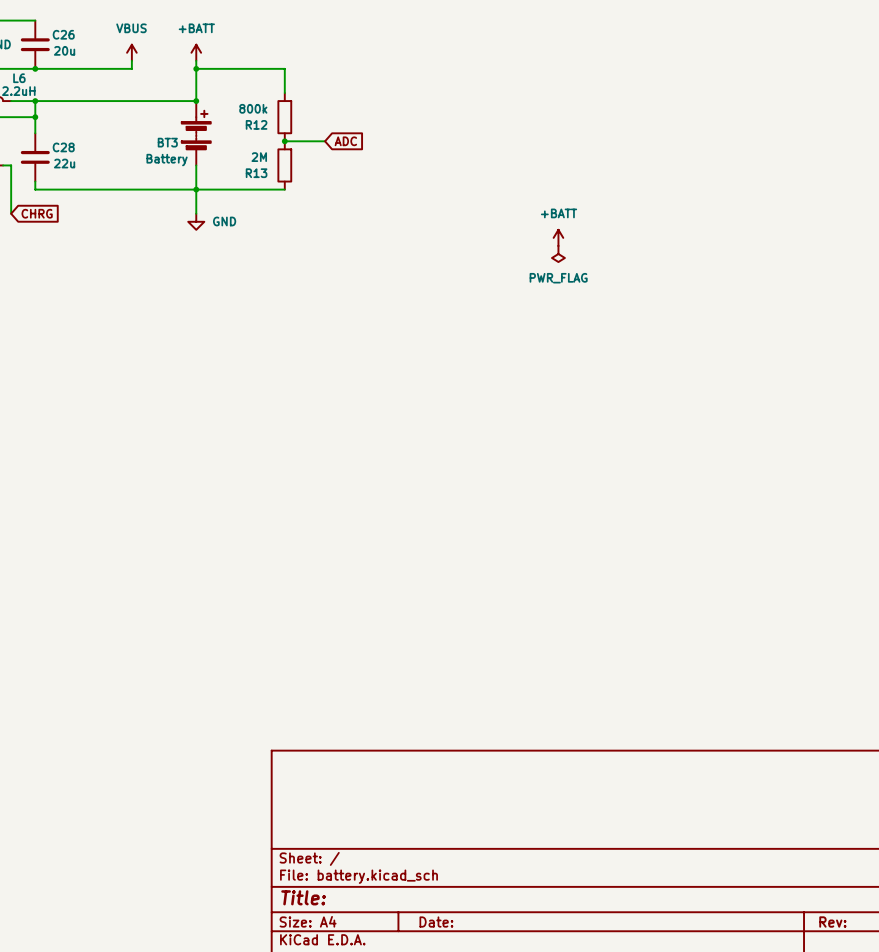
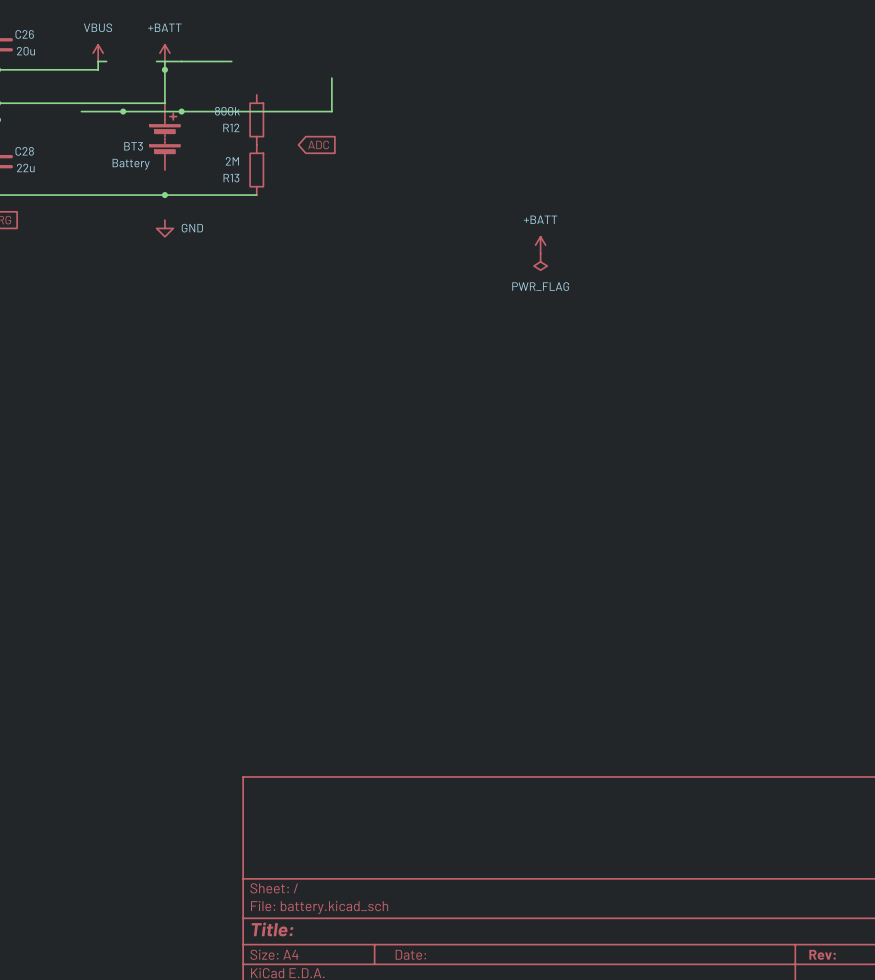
wire: none -> (98, 61) (106, 61)
wire: none -> (156, 61) (231, 61)
wire: (196, 68) (284, 68) (284, 93) -> none
wire: none -> (331, 78) (331, 111) (81, 111)
junction position: (196, 101) -> (181, 111)
junction: none -> (123, 111)
wire: (284, 141) (325, 141) -> none
junction: (284, 141) -> none
wire: (196, 165) (196, 213) -> none

